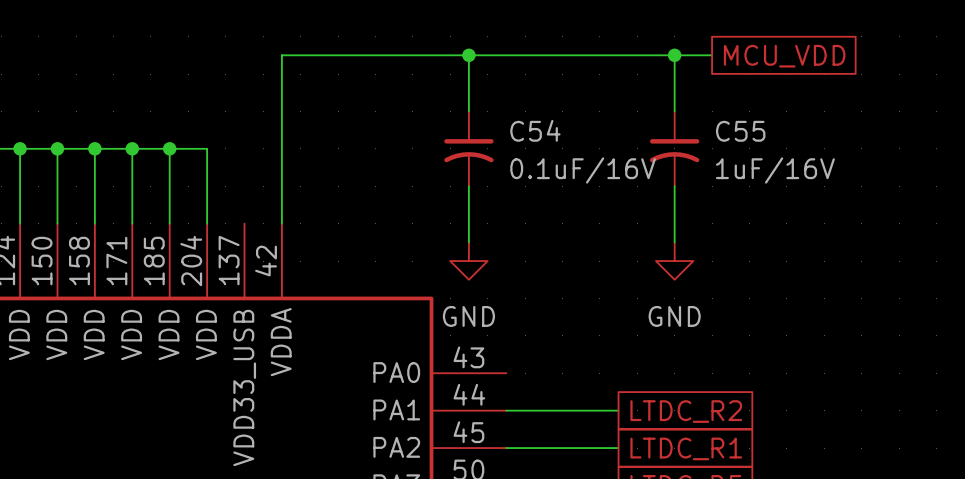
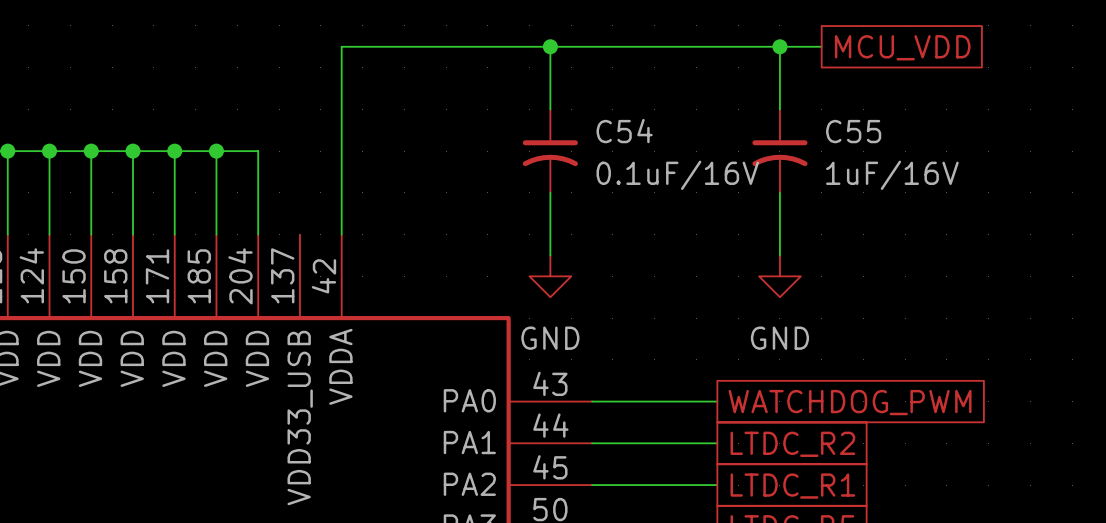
wire: none -> (592, 401) (717, 401)
global label: none -> WATCHDOG_PWM (850, 402)

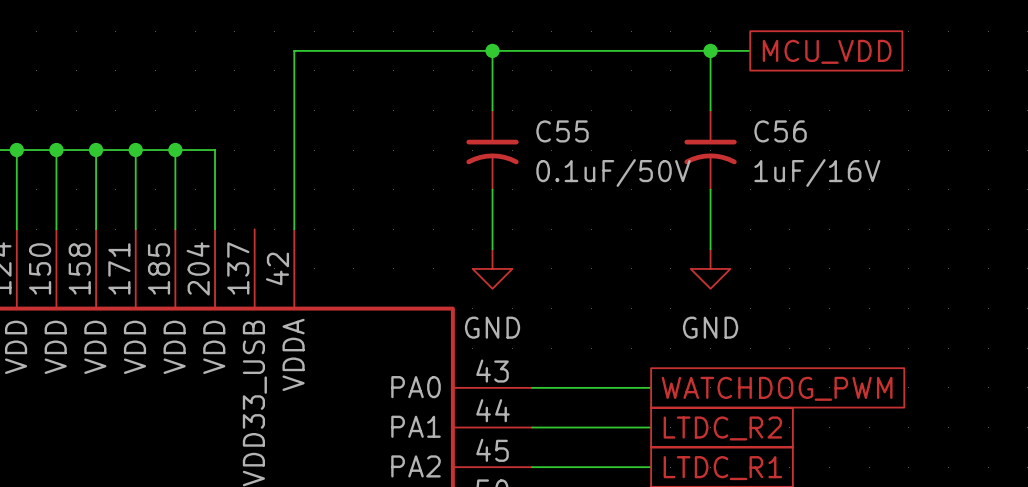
C54 name: C54 (624, 131) -> C55 (562, 131)
C55 name: C55 (853, 131) -> C56 (780, 131)
C54 value: 0.1uF/16V (677, 175) -> 0.1uF/50V (613, 172)

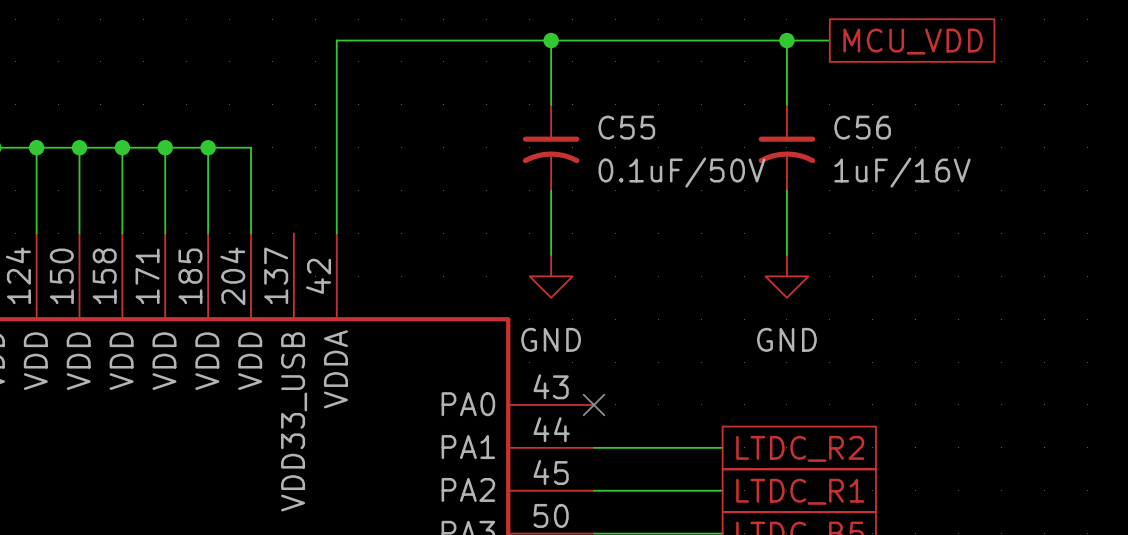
wire: (532, 387) (651, 387) -> none
no-connect mark: none -> (593, 404)
global label: WATCHDOG_PWM (777, 388) -> none

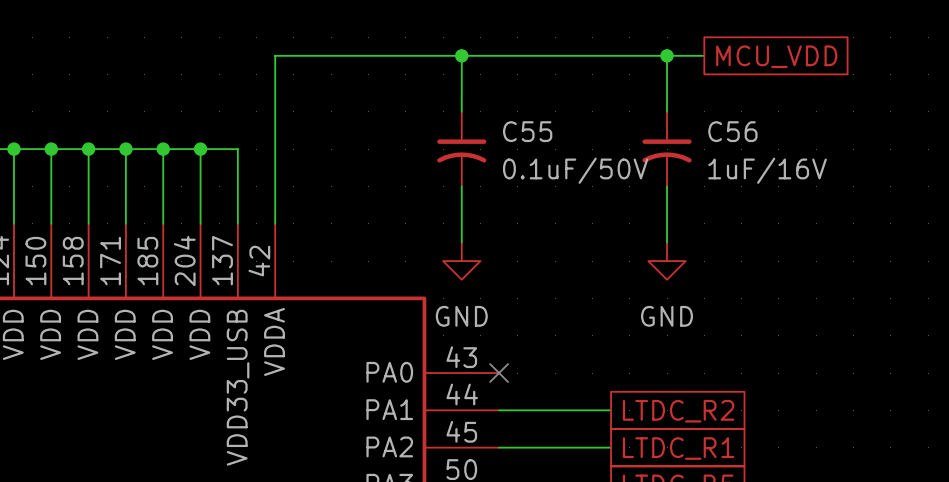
wire: none -> (200, 149) (237, 149) (237, 223)
junction: none -> (200, 149)

